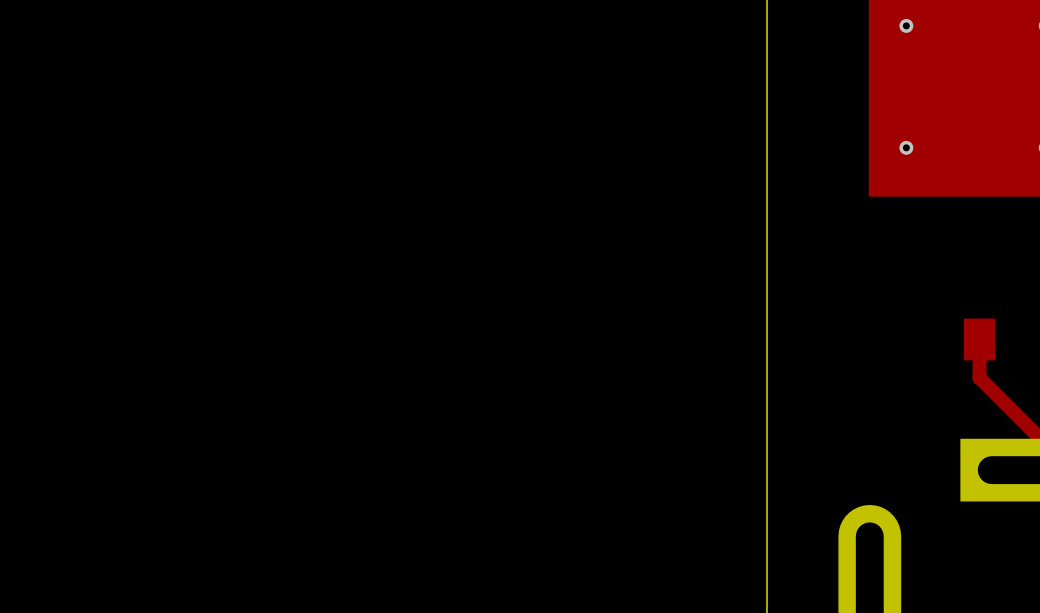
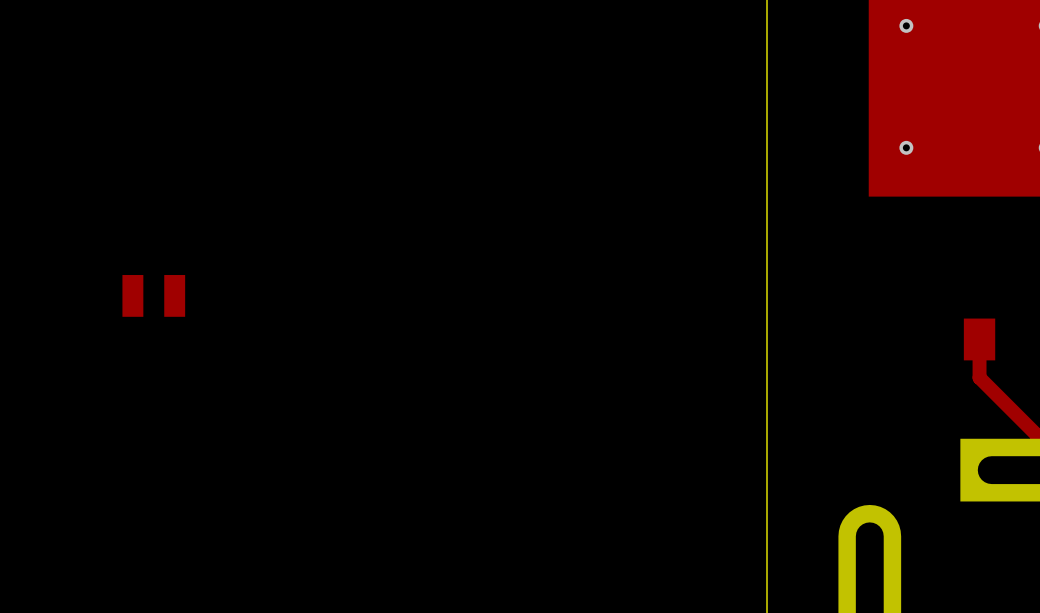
part: none -> (153, 295)

